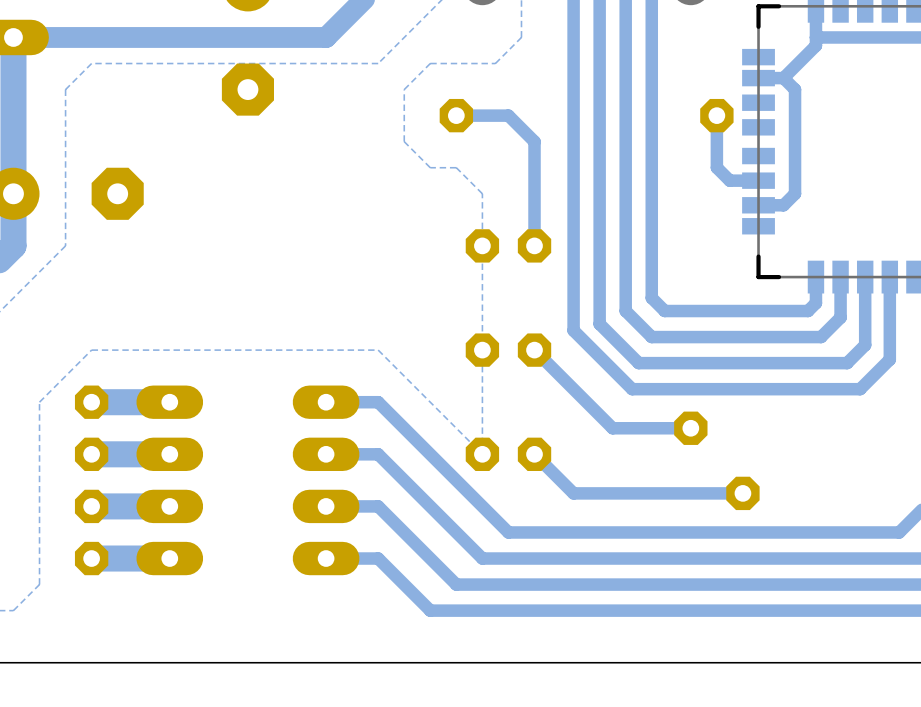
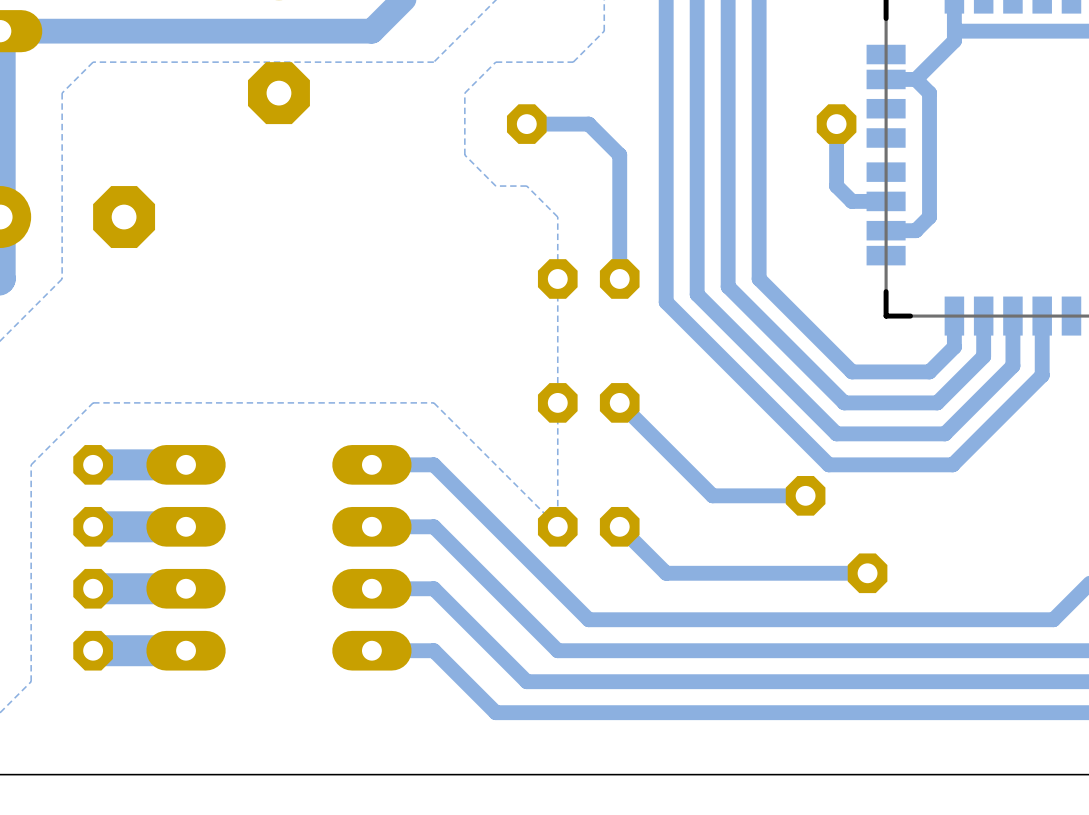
bottom track: (651, 245) (651, 298) (664, 311) (808, 311) -> (759, 278) (852, 371) (929, 371) (945, 356)
bottom track: (625, 252) (625, 311) (651, 337) (821, 337) (840, 317) (840, 311) -> (728, 286) (844, 402) (937, 402) (983, 356)
bottom track: (599, 258) (599, 324) (638, 363) (847, 363) (865, 345) (865, 319) -> (697, 294) (836, 433) (945, 433) (1012, 365)
bottom track: (573, 265) (573, 330) (632, 389) (860, 389) (889, 359) (889, 326) -> (666, 302) (828, 464) (952, 464) (1042, 375)

